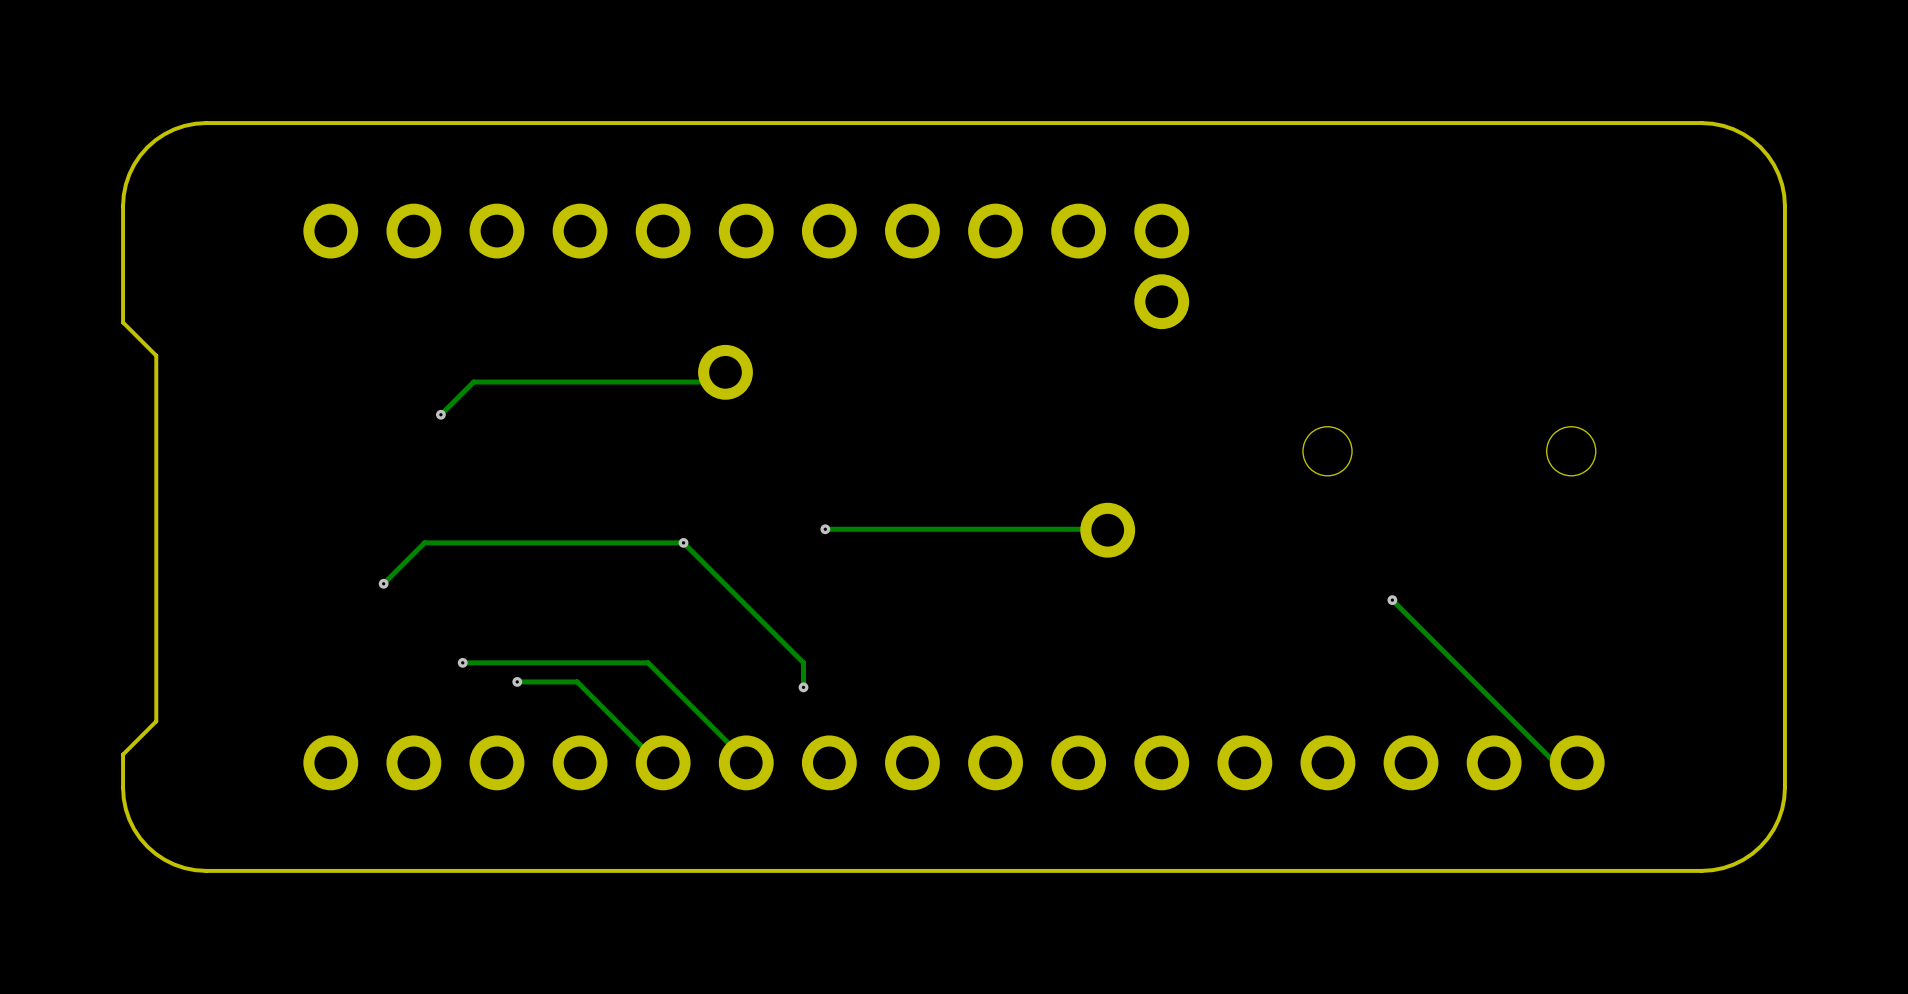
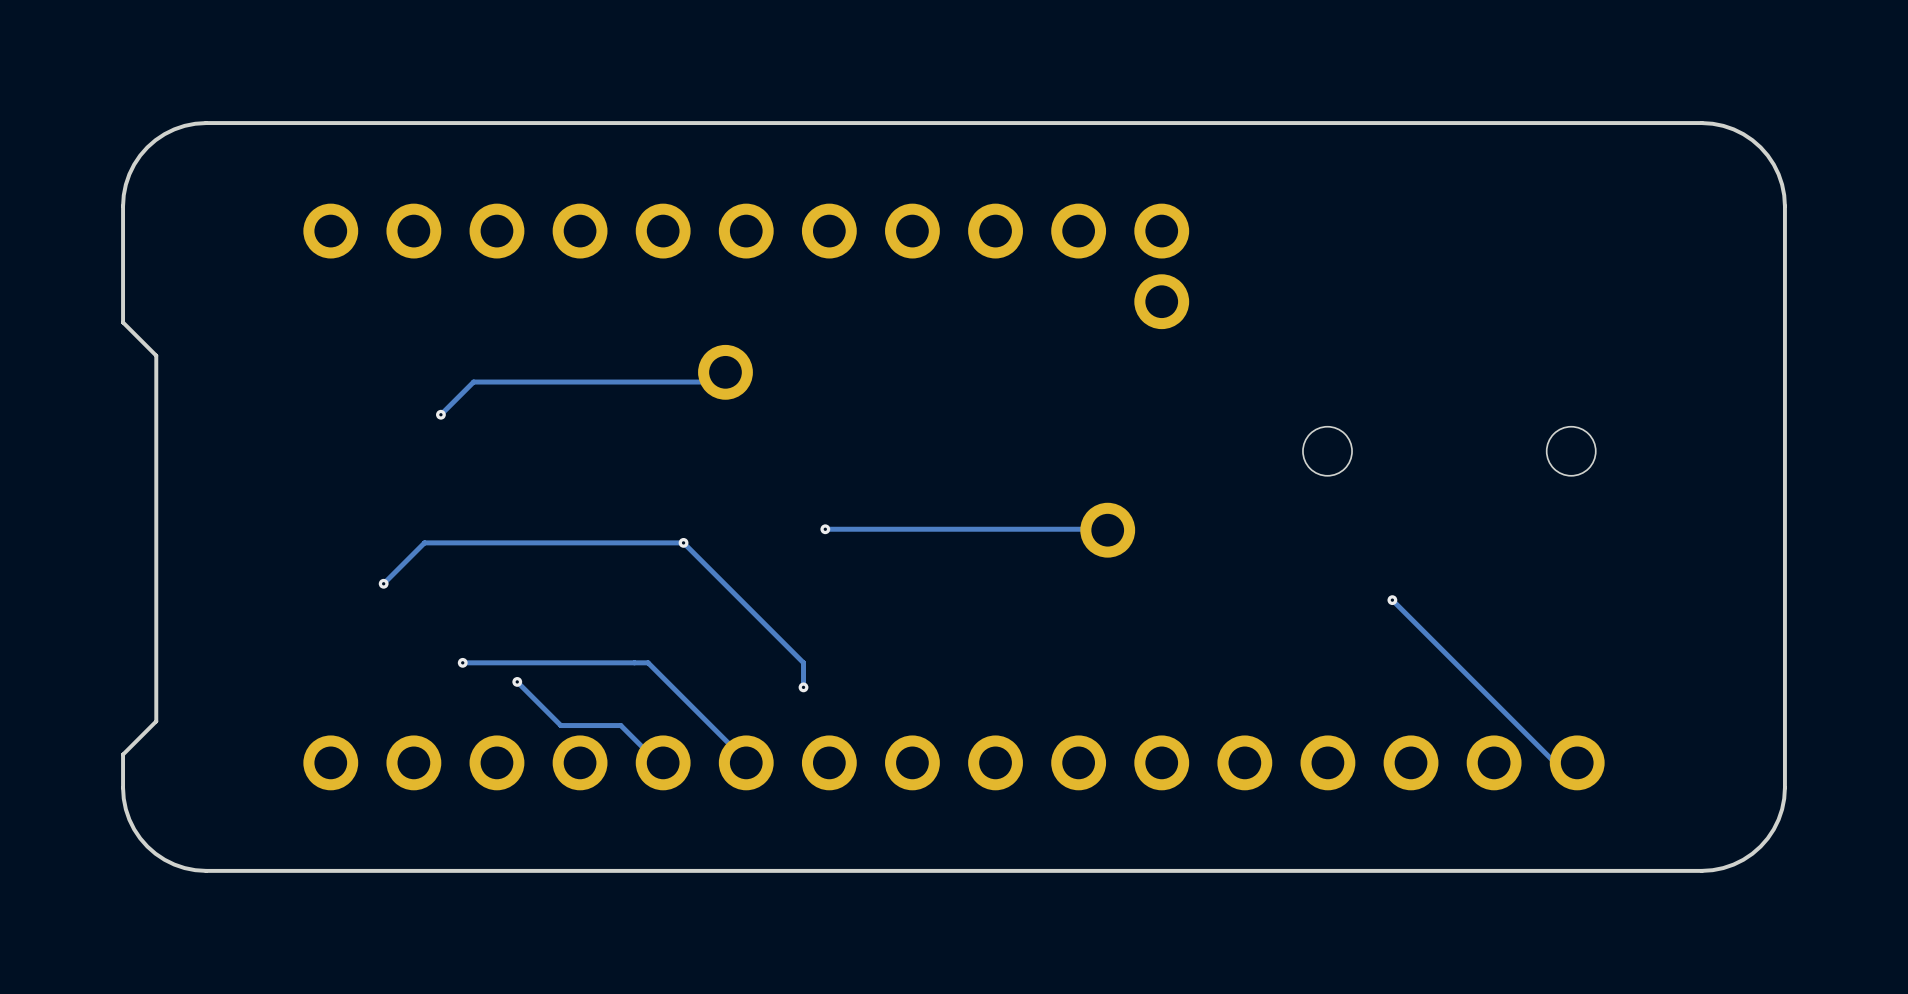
track: (517, 681) (577, 681) (620, 725) -> (517, 681) (560, 725) (620, 725)

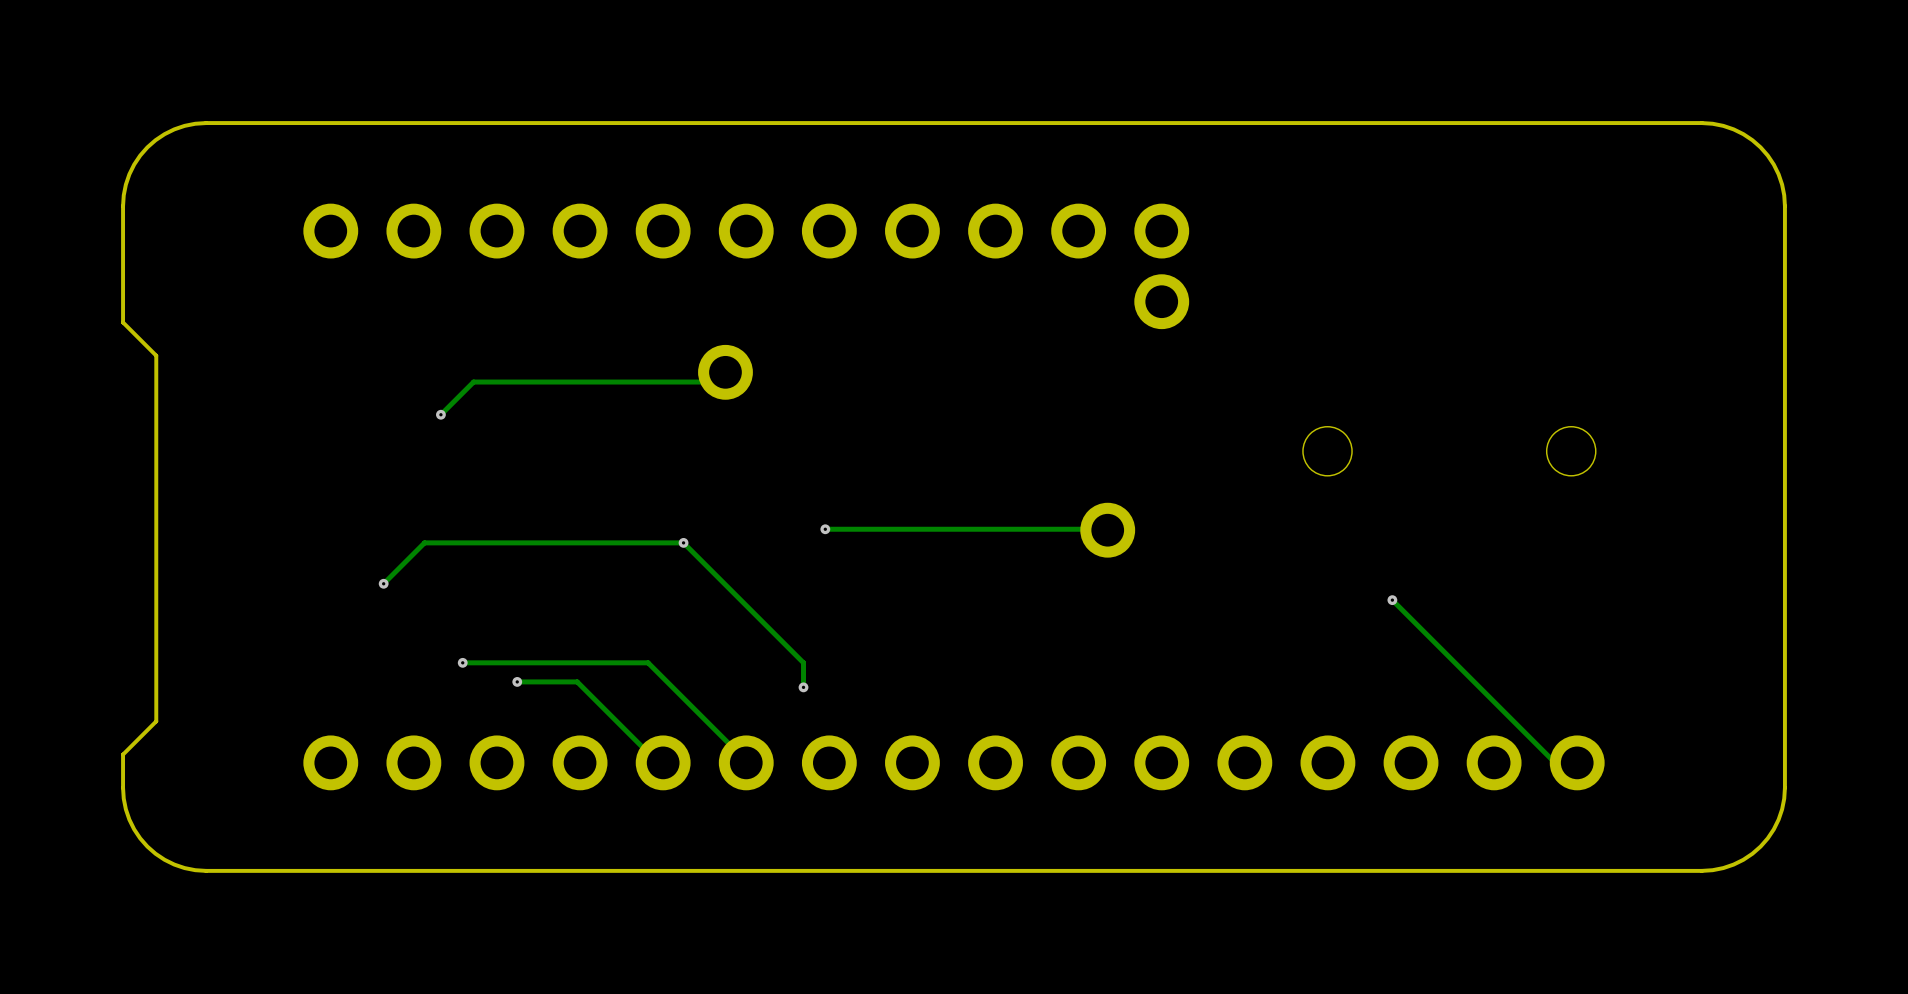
track: (517, 681) (560, 725) (620, 725) -> (517, 681) (577, 681) (620, 725)

